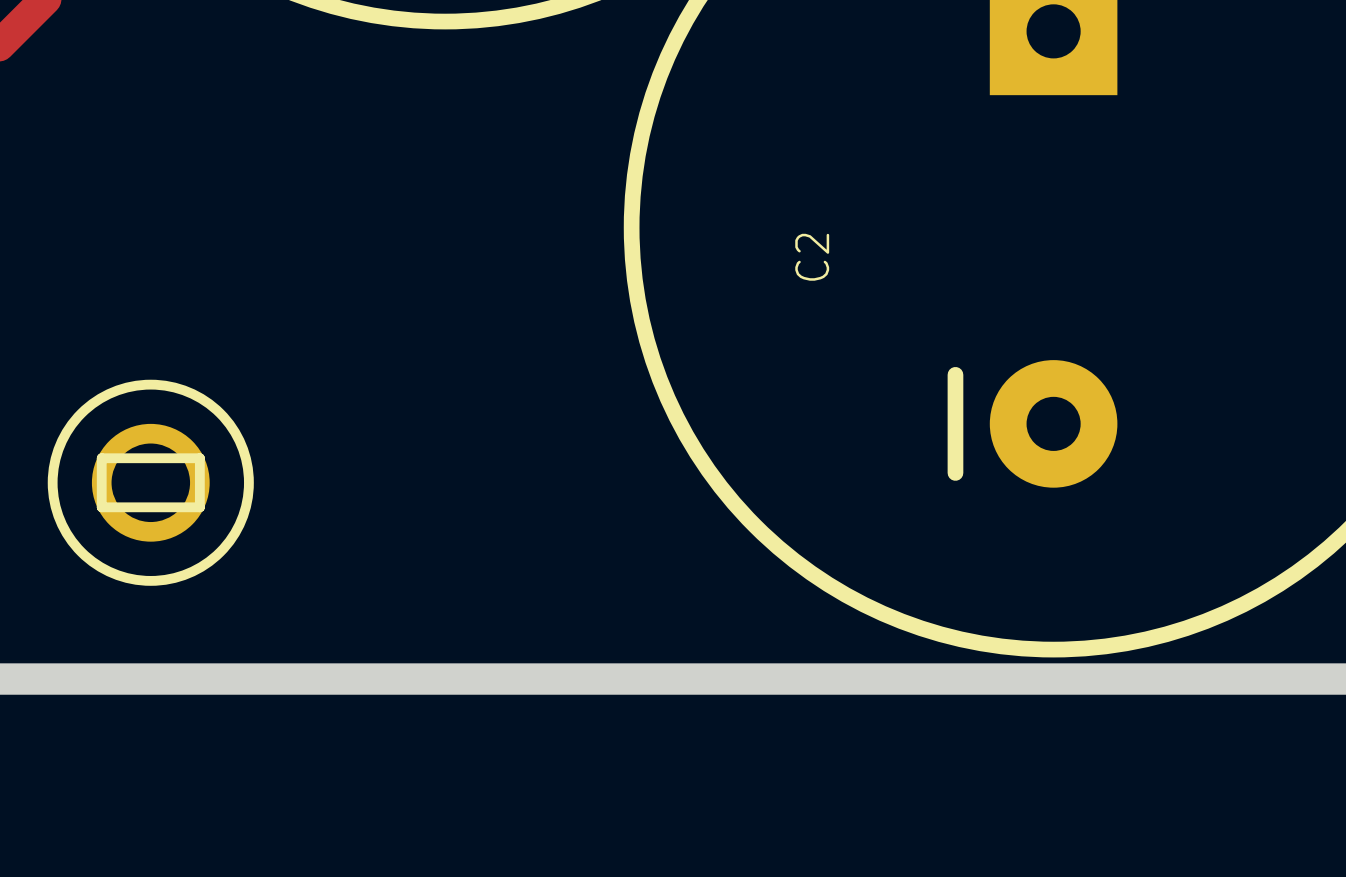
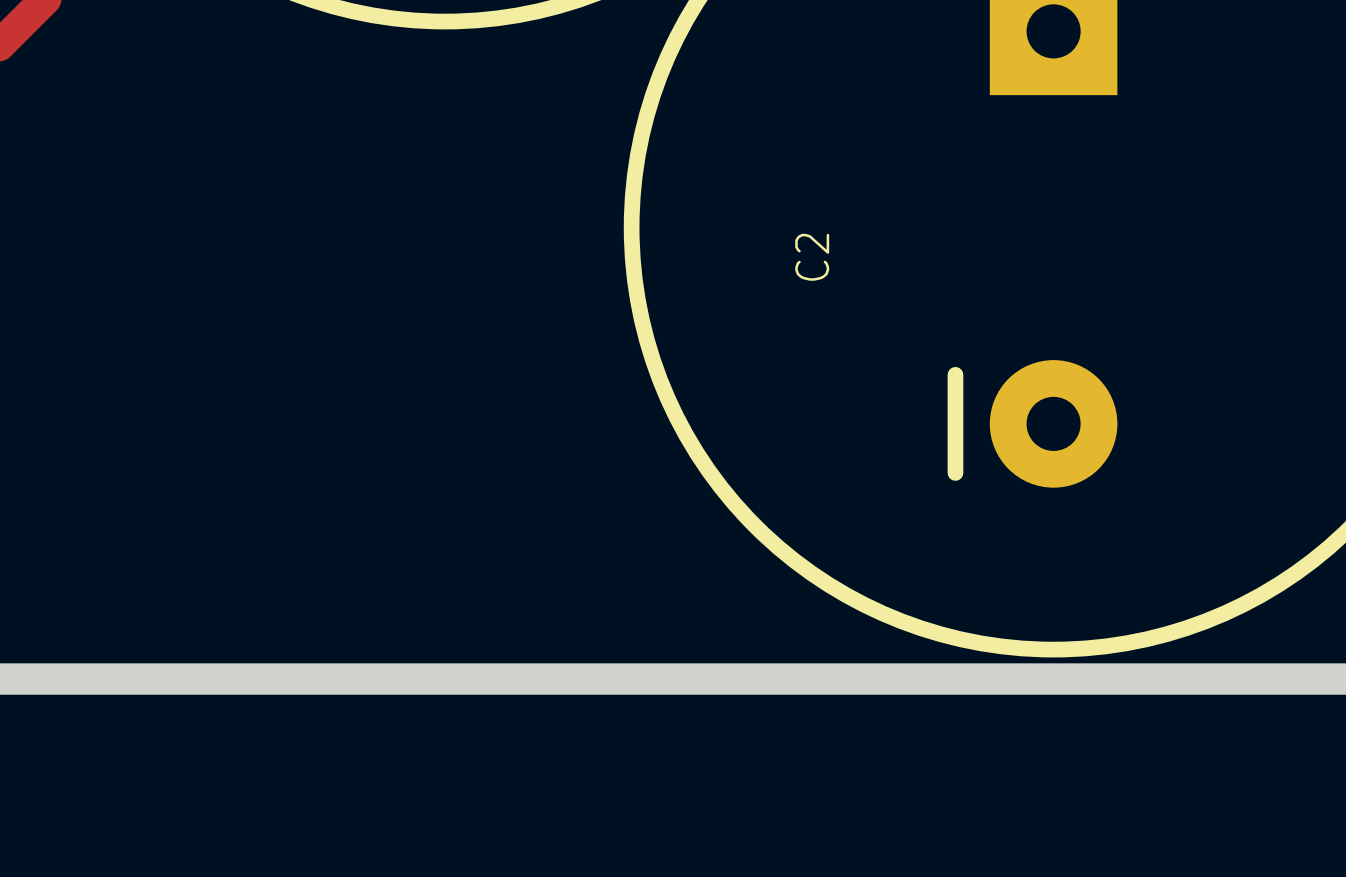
part: (150, 482) -> none

